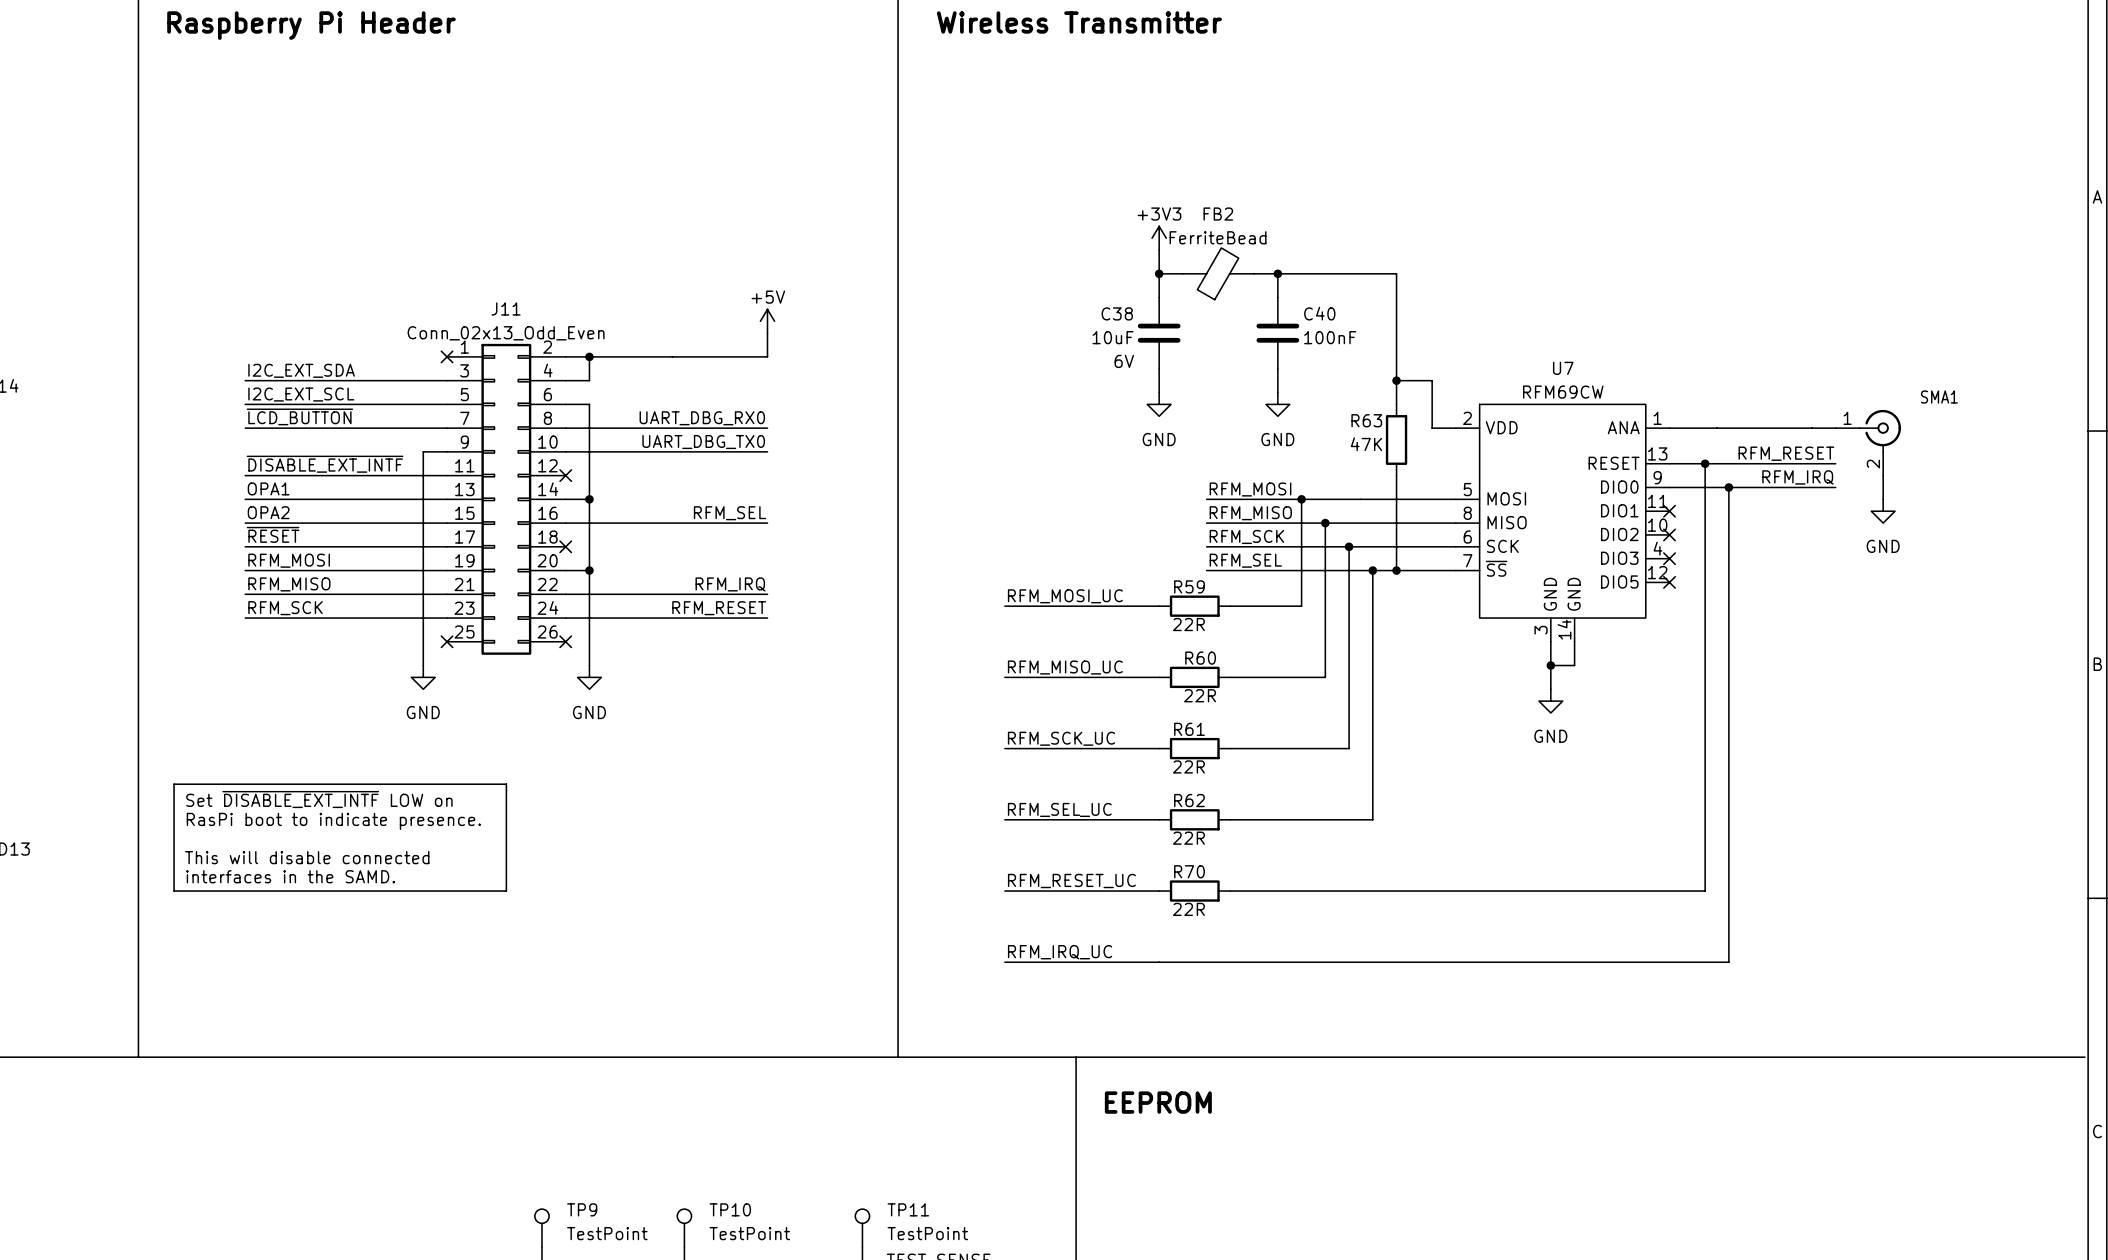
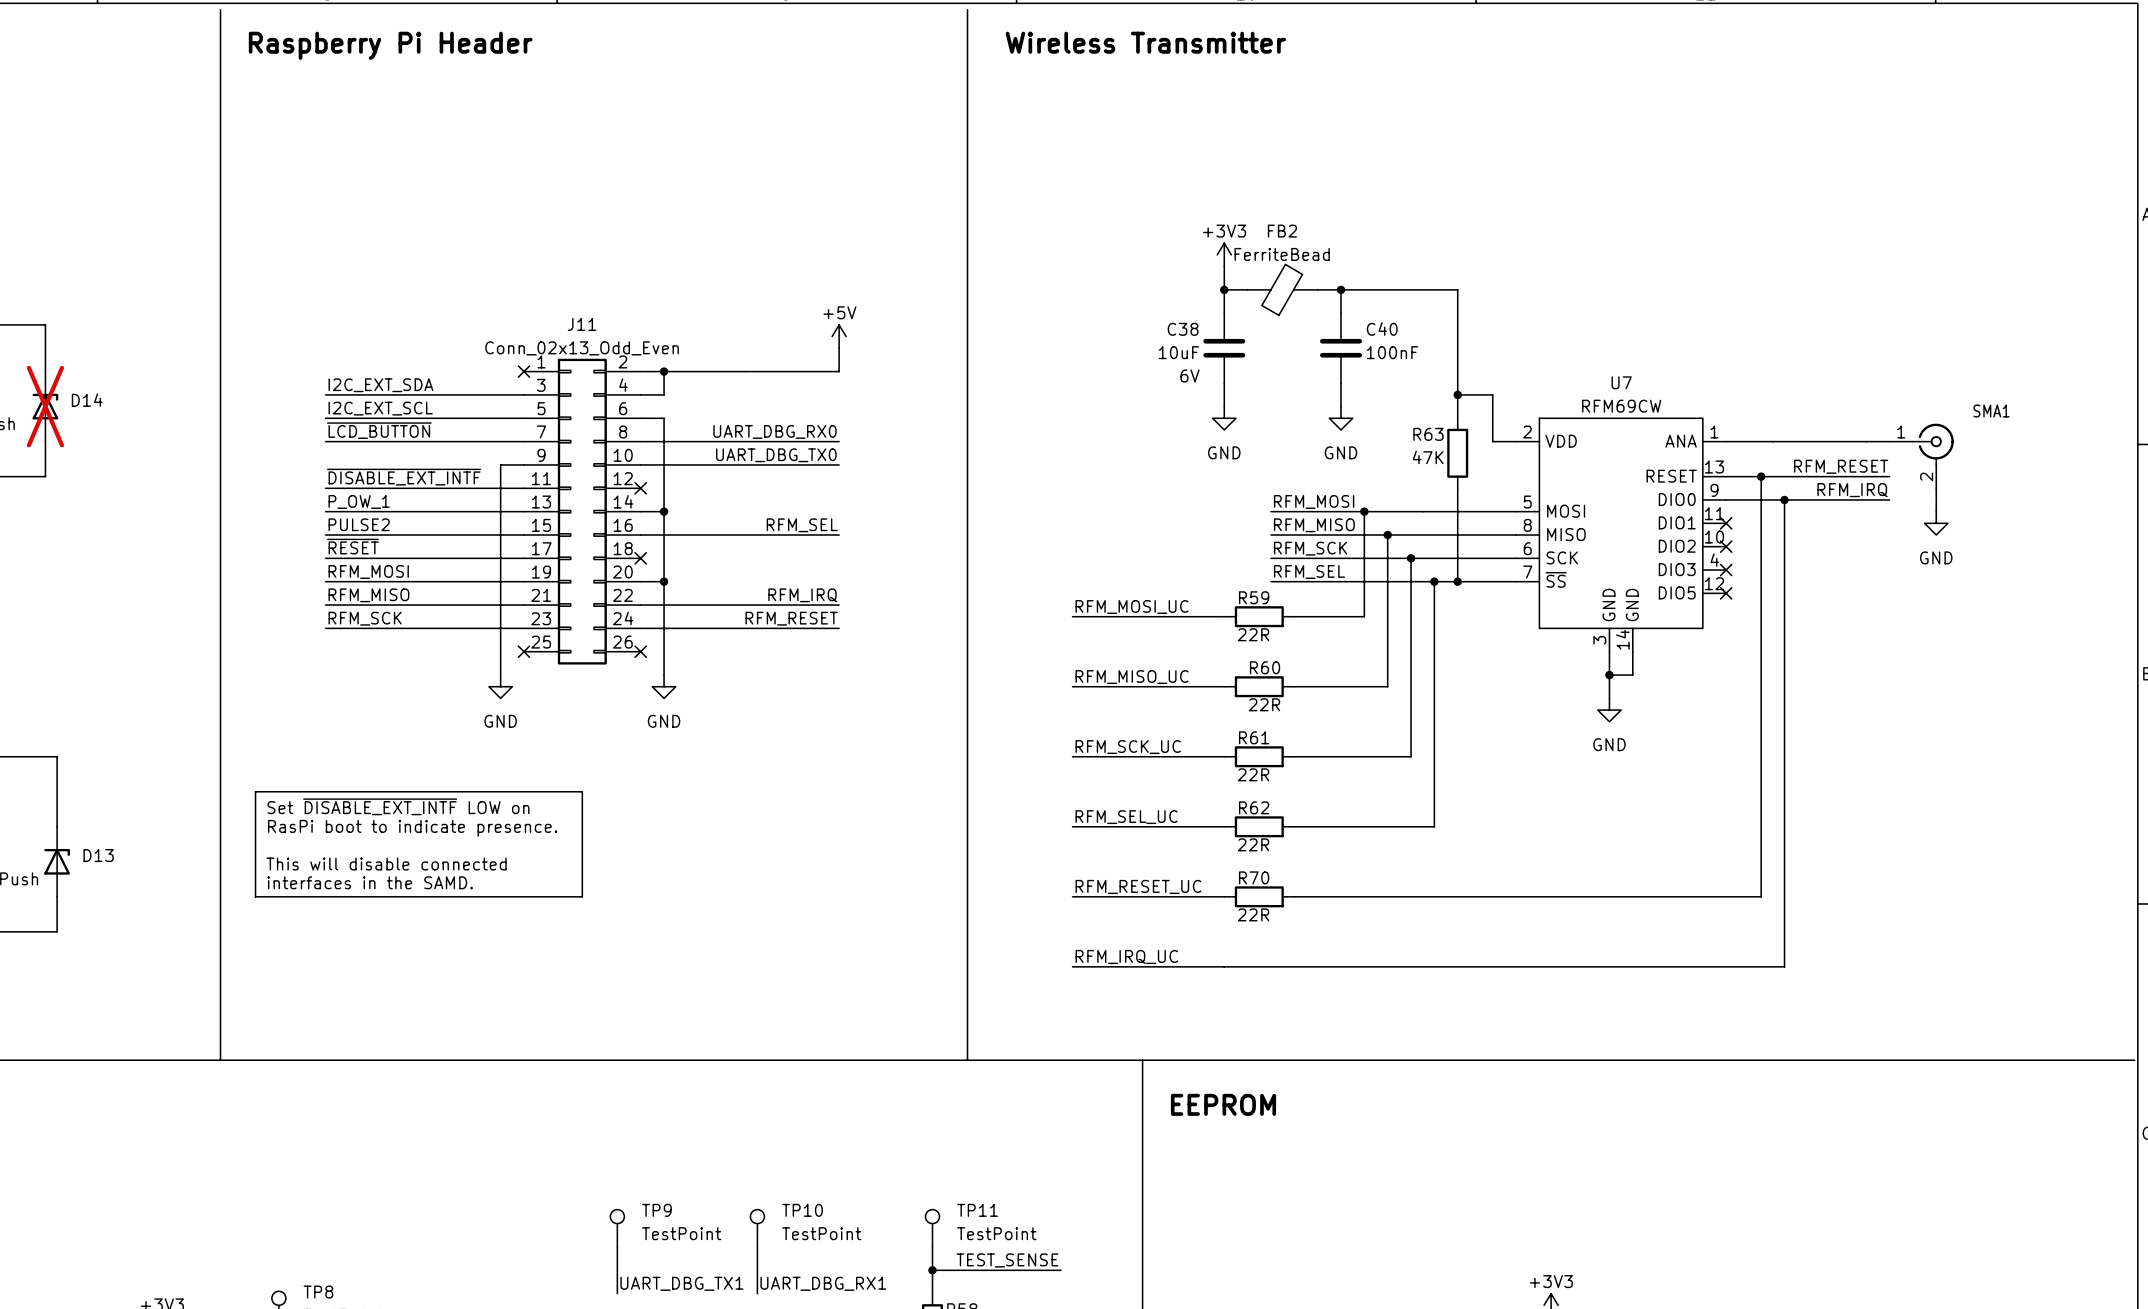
label: OPA1 (268, 488) -> P_OW_1 (359, 501)
label: OPA2 (268, 512) -> PULSE2 (359, 524)

